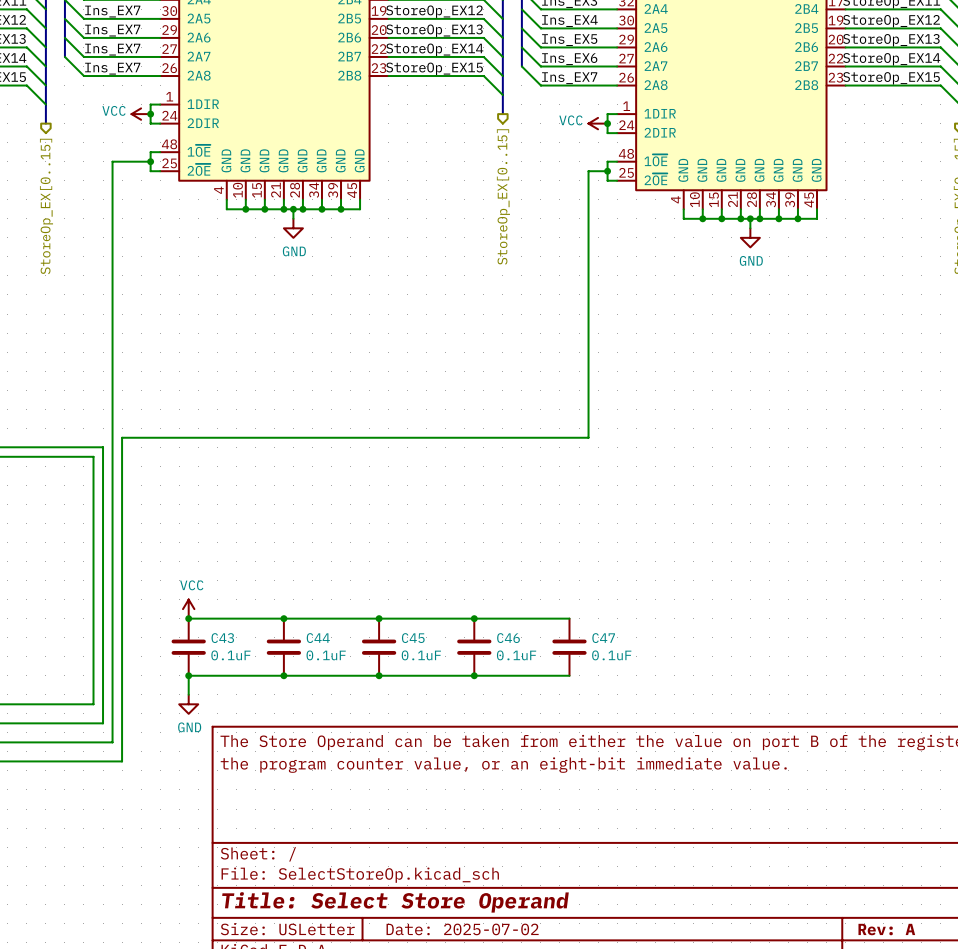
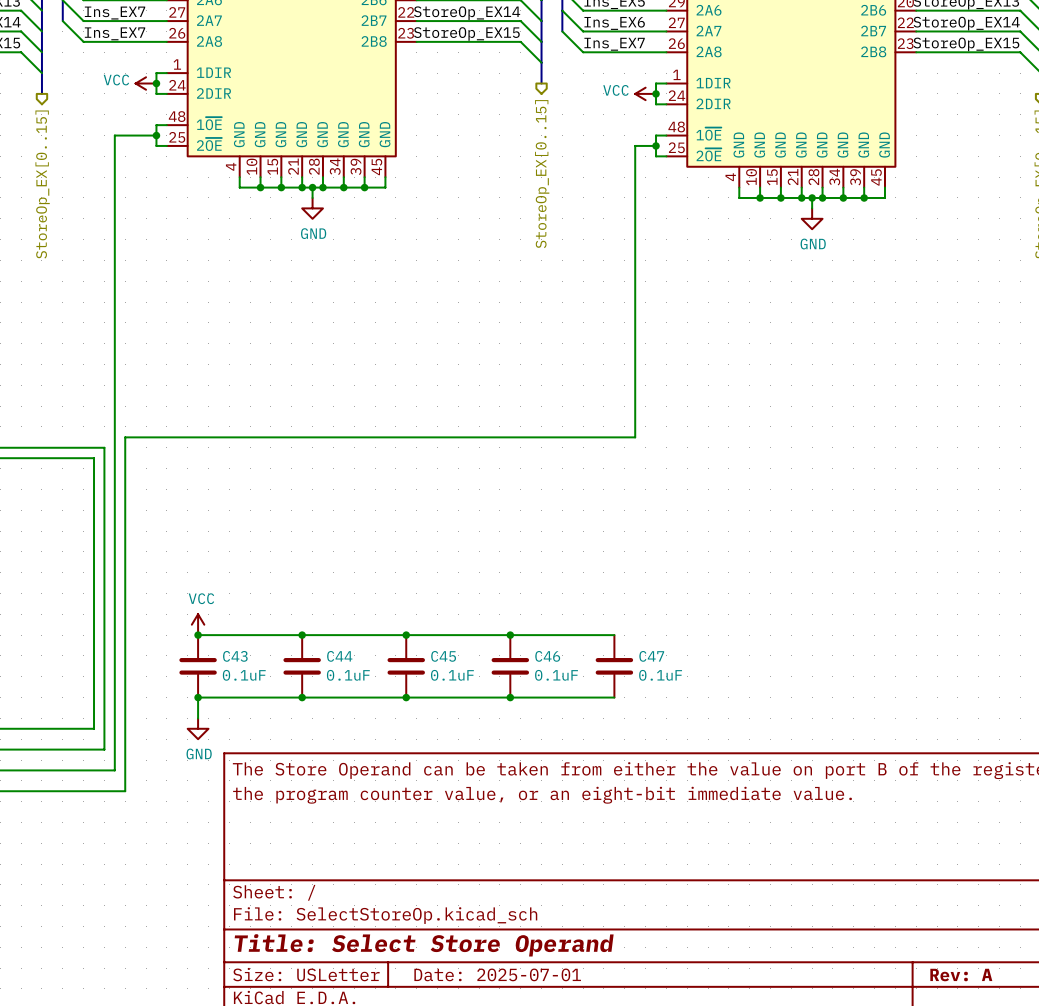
title block: Date: 2025-07-02 (462, 929) -> Date: 2025-07-01 (497, 974)

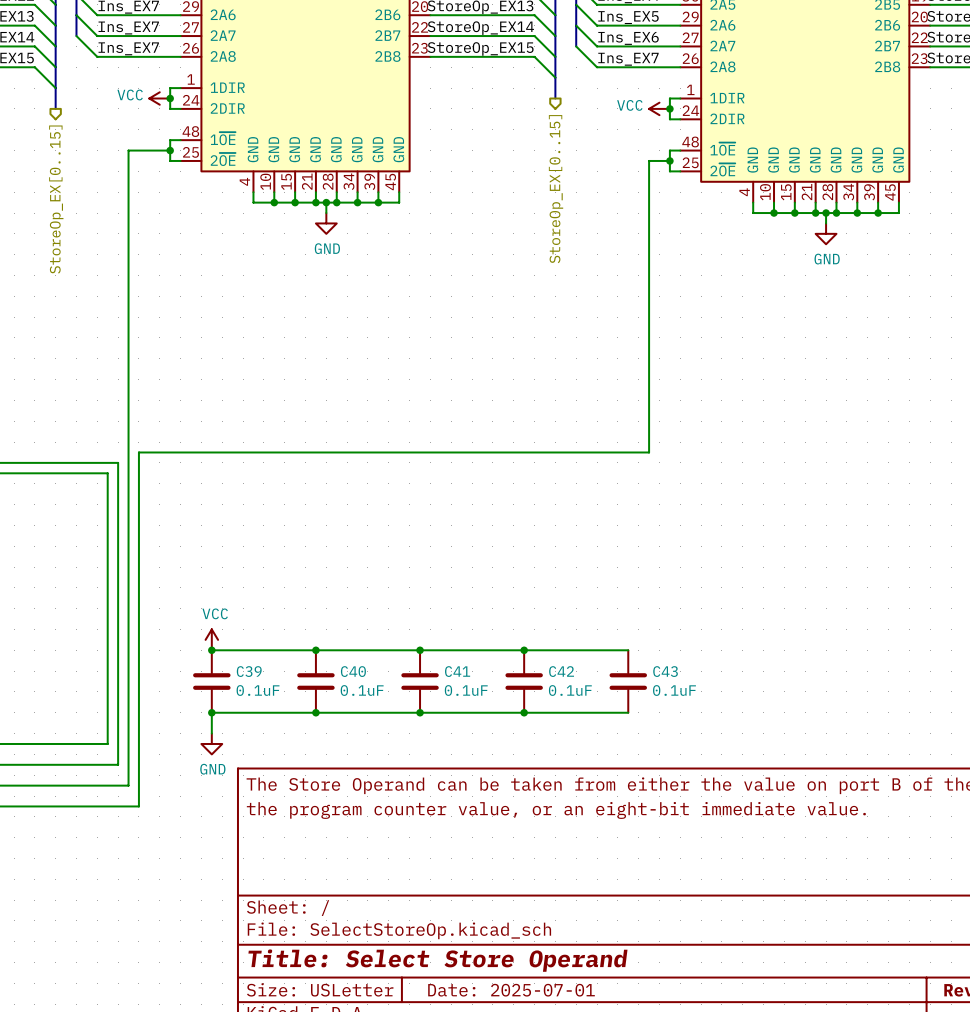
C43 name: C43 (235, 656) -> C39 (249, 671)
C44 name: C44 (339, 656) -> C40 (353, 671)
C45 name: C45 (443, 656) -> C41 (457, 671)
C46 name: C46 (547, 656) -> C42 (561, 671)
C47 name: C47 (651, 656) -> C43 (665, 671)

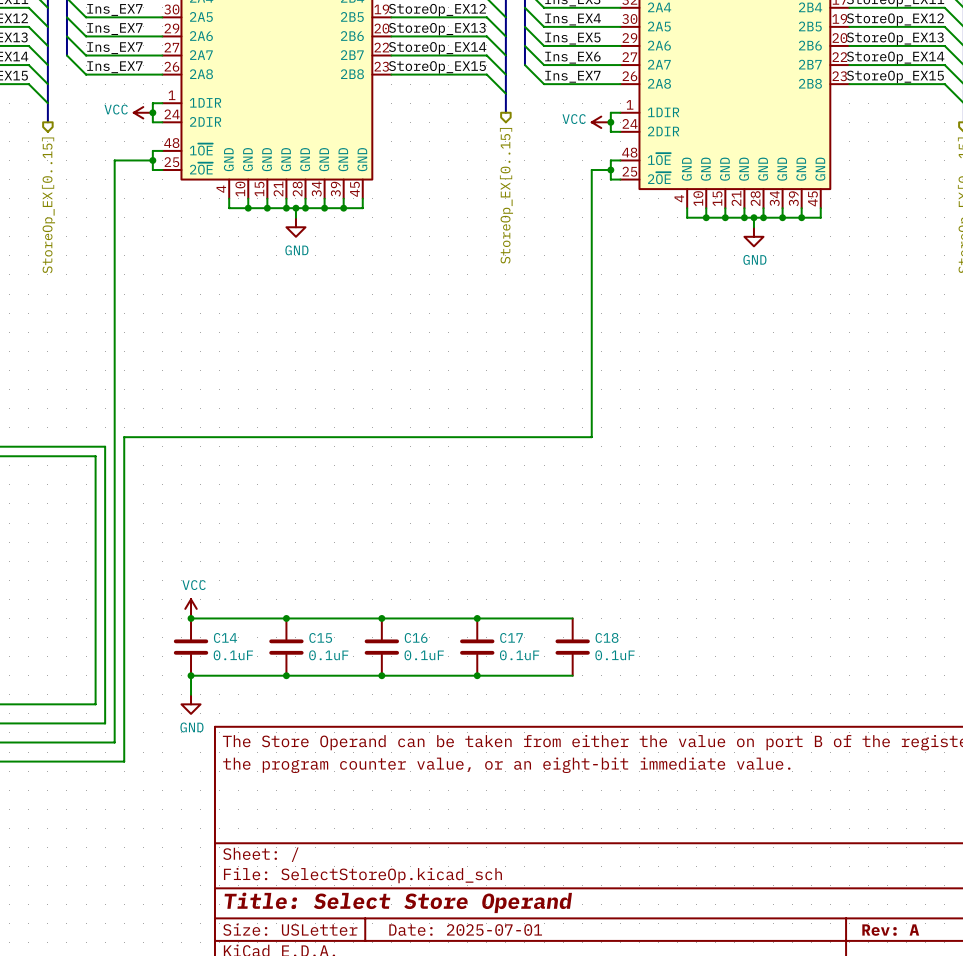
C39 name: C39 (249, 671) -> C14 (225, 637)
C40 name: C40 (353, 671) -> C15 (320, 637)
C41 name: C41 (457, 671) -> C16 (416, 637)
C42 name: C42 (561, 671) -> C17 (511, 637)
C43 name: C43 (665, 671) -> C18 (607, 637)

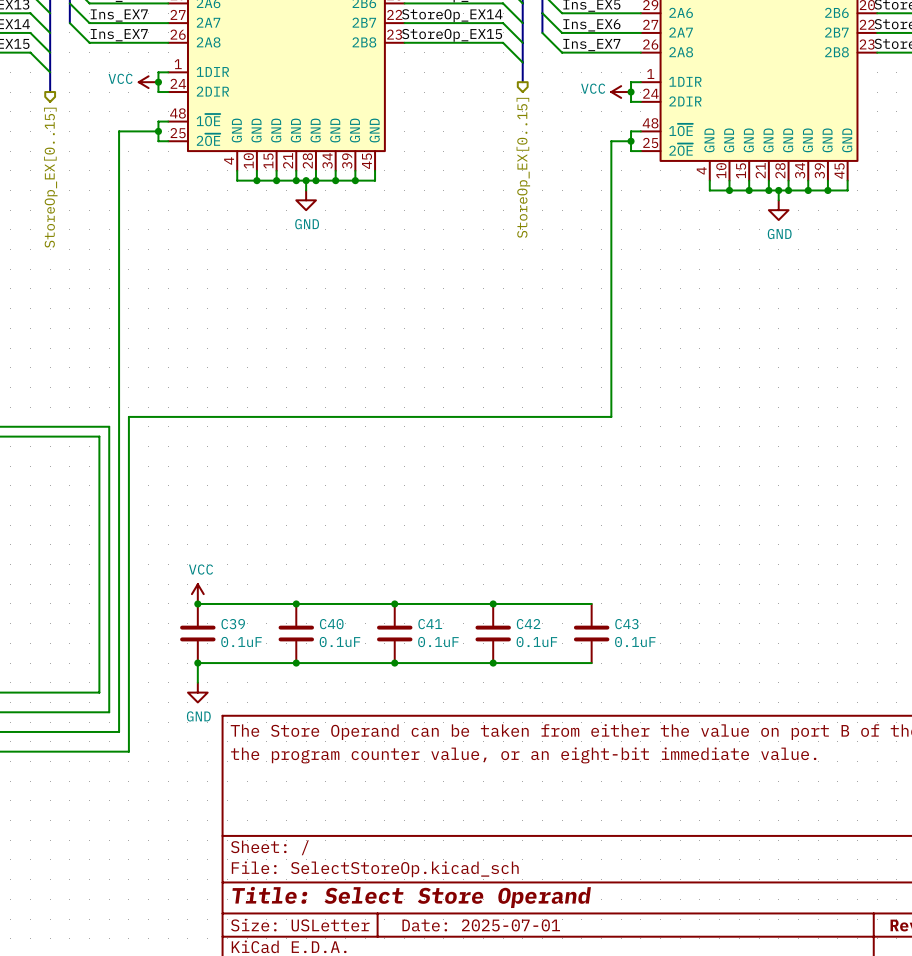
C14 name: C14 (225, 637) -> C39 (233, 624)
C15 name: C15 (320, 637) -> C40 (331, 624)
C16 name: C16 (416, 637) -> C41 (430, 624)
C17 name: C17 (511, 637) -> C42 (528, 624)
C18 name: C18 (607, 637) -> C43 (626, 624)

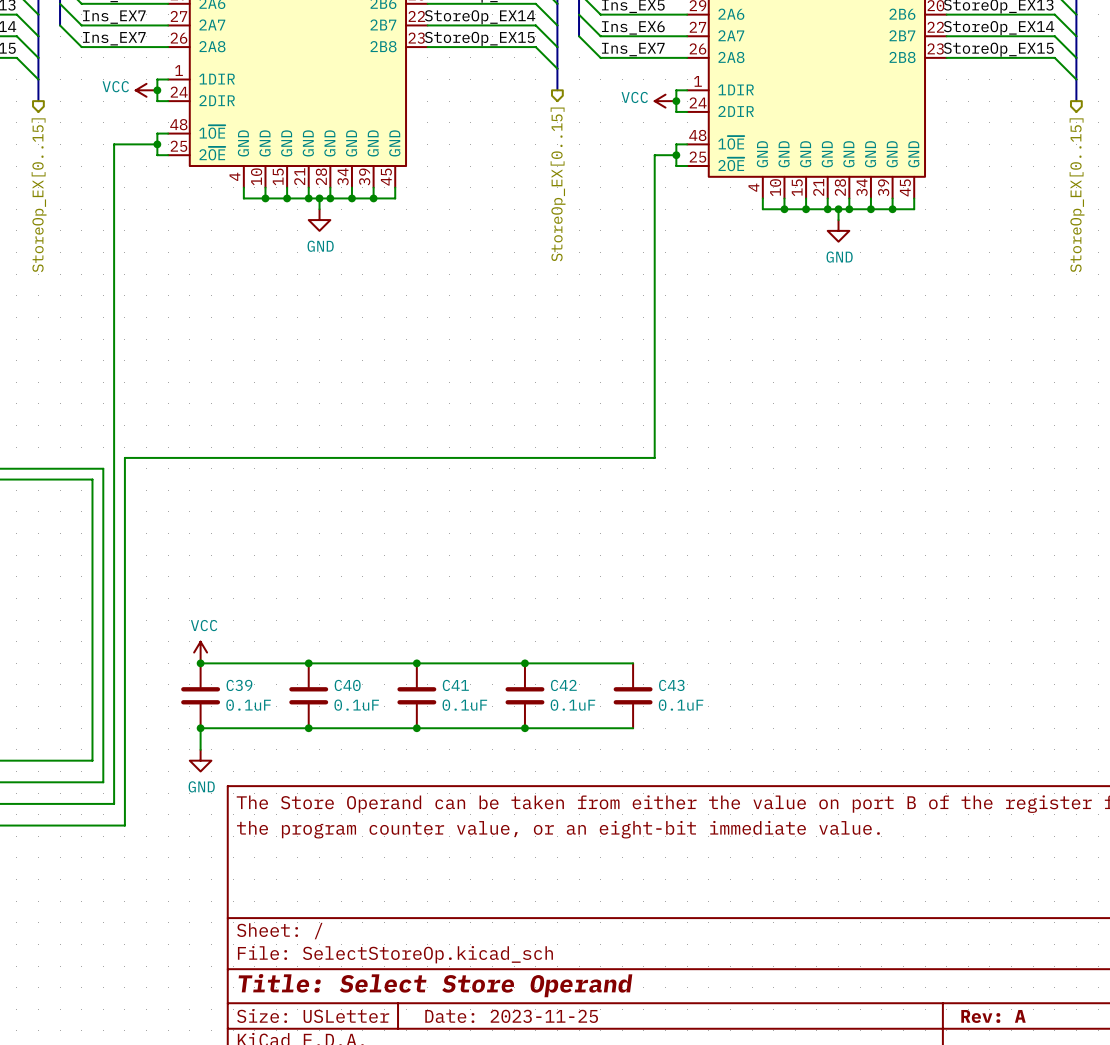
title block: Date: 2025-07-01 (481, 925) -> Date: 2023-11-25 (511, 1016)

